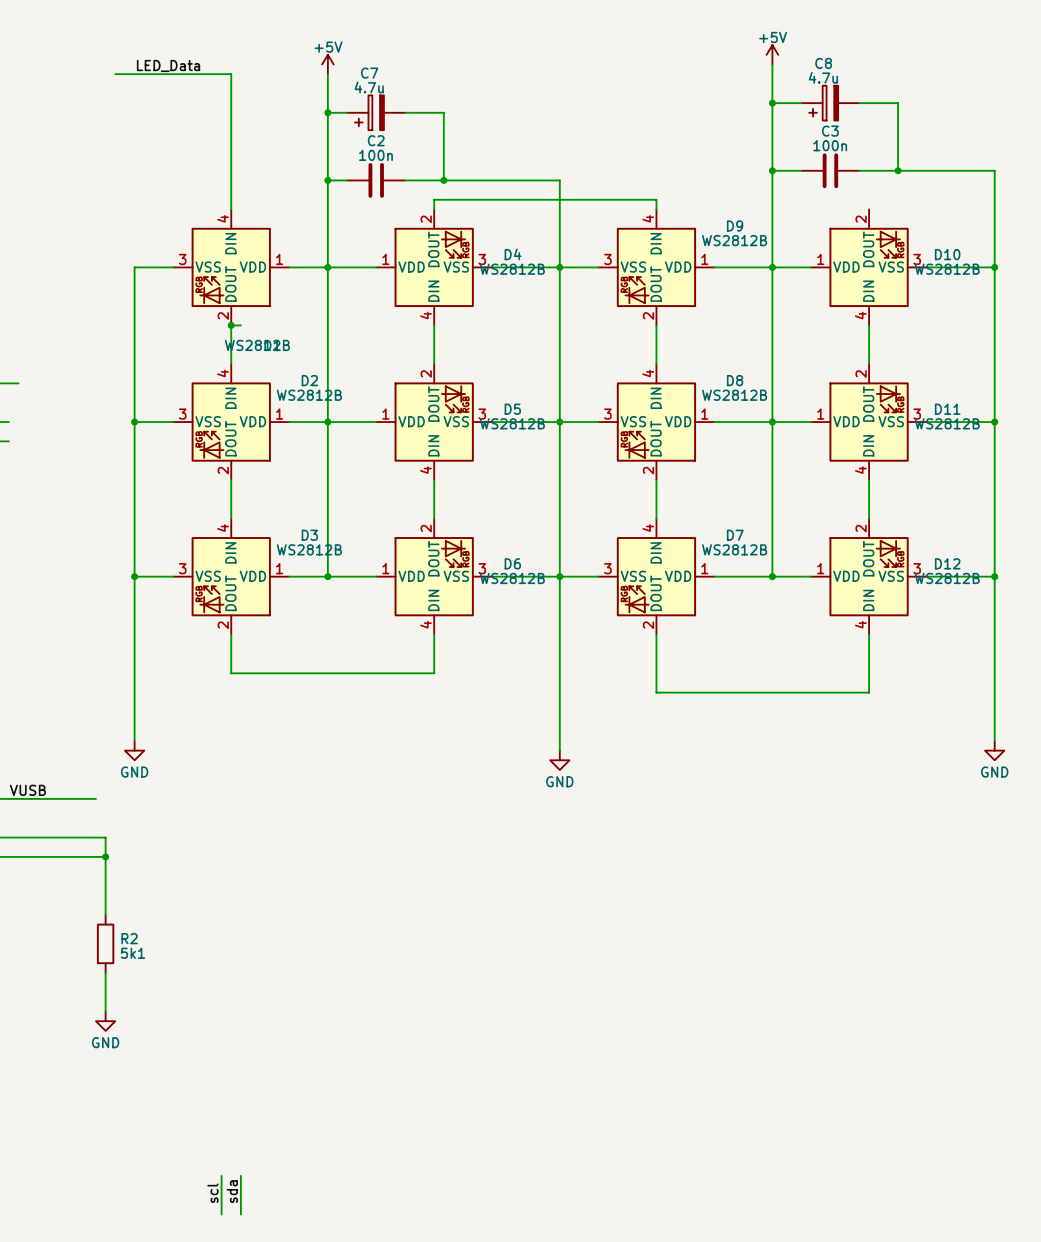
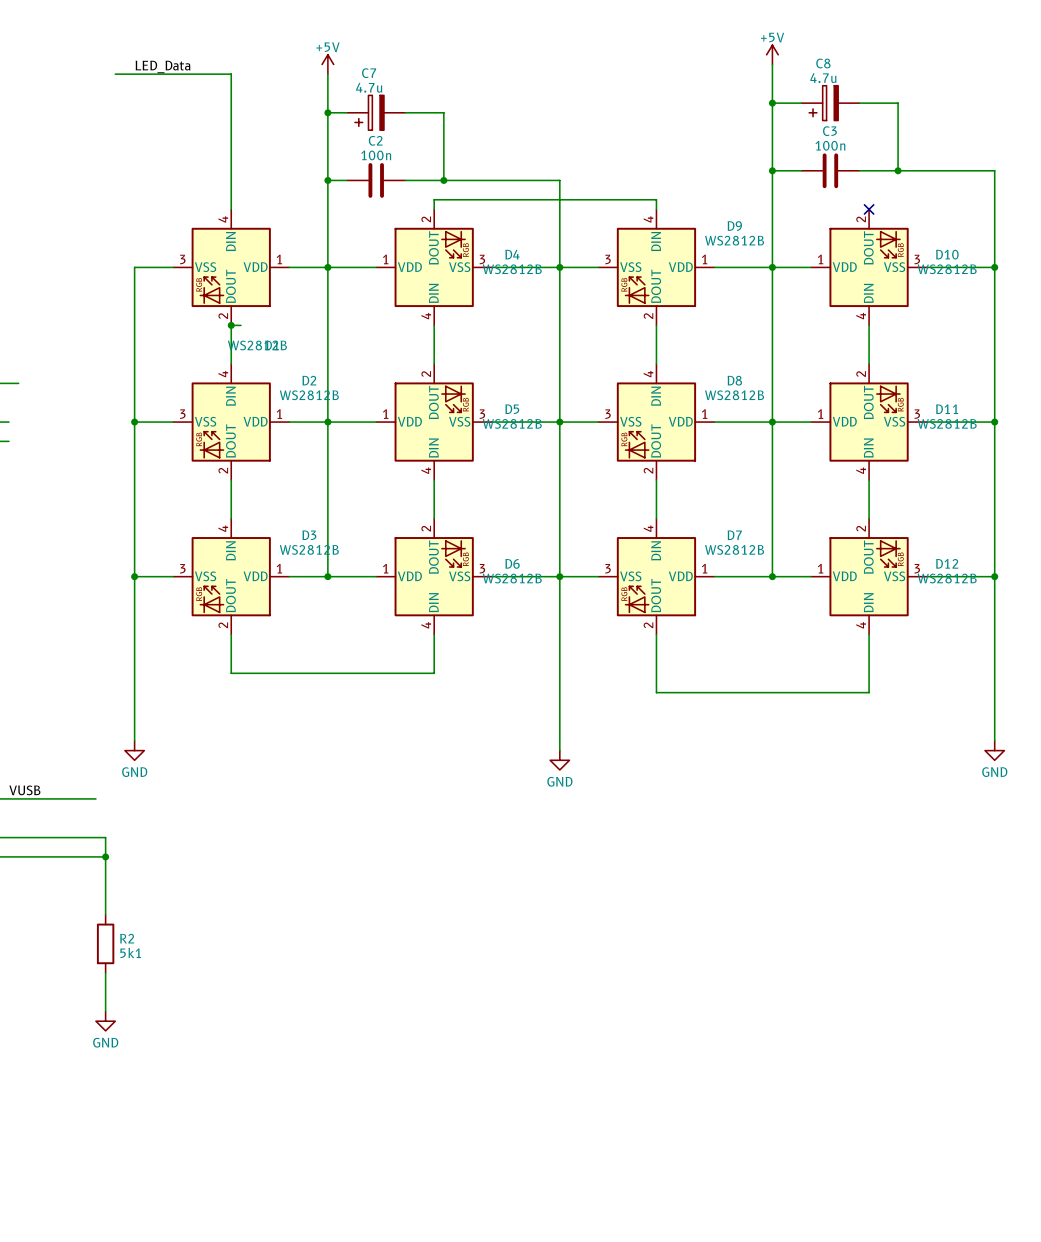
no-connect mark: none -> (869, 209)
wire: (221, 1175) (221, 1214) -> none
wire: (240, 1175) (240, 1214) -> none
label: sda (232, 1191) -> none
label: scl (212, 1193) -> none

